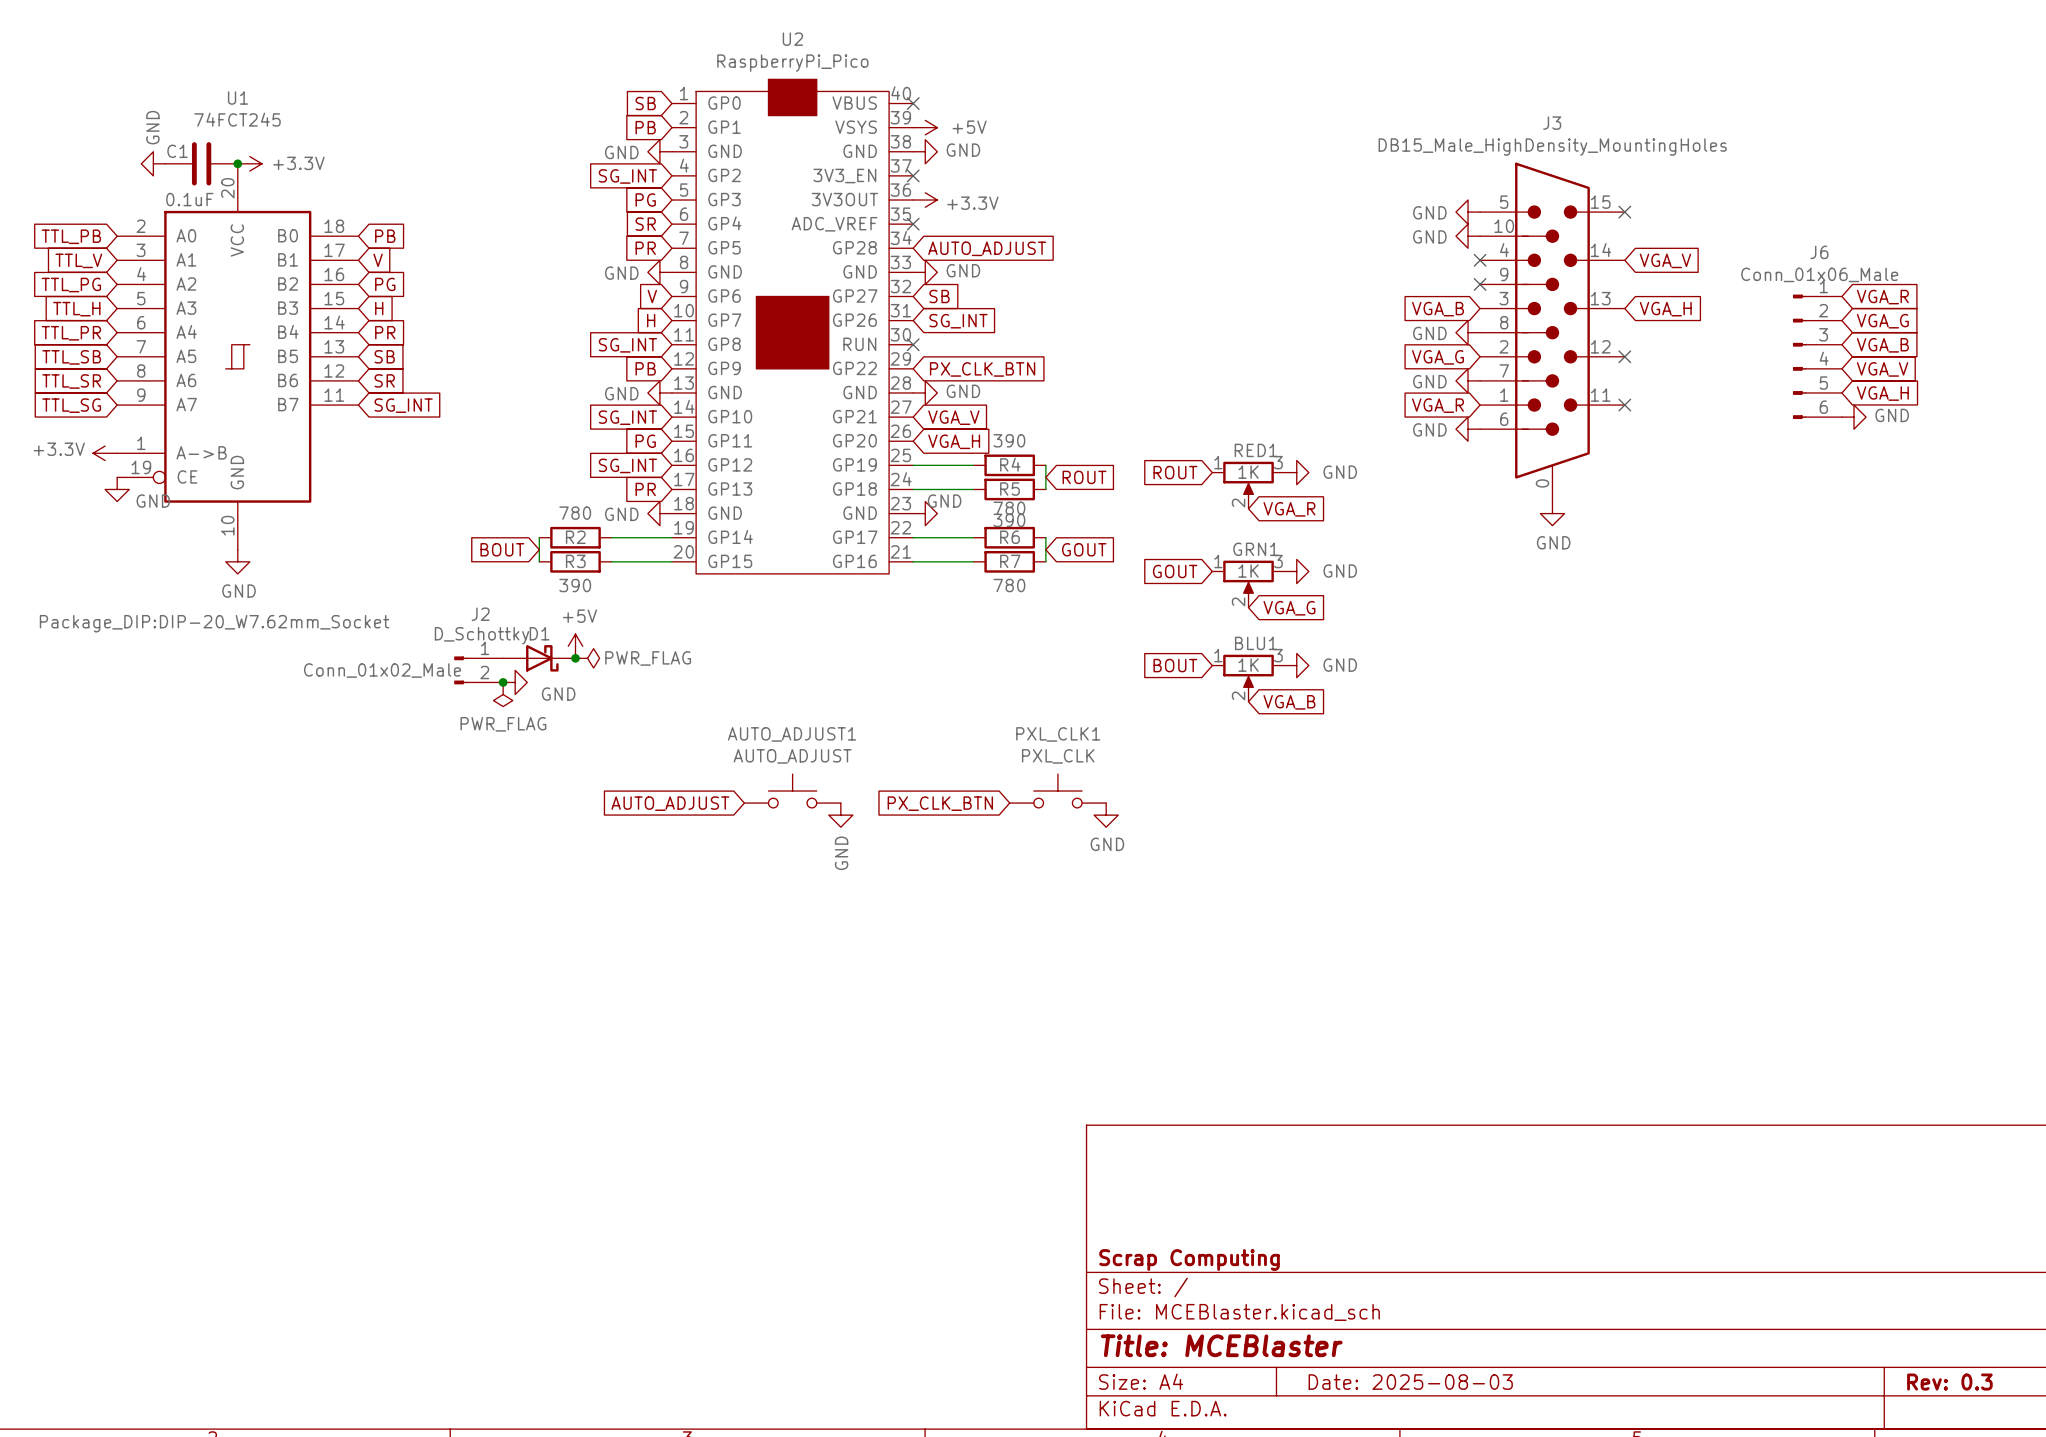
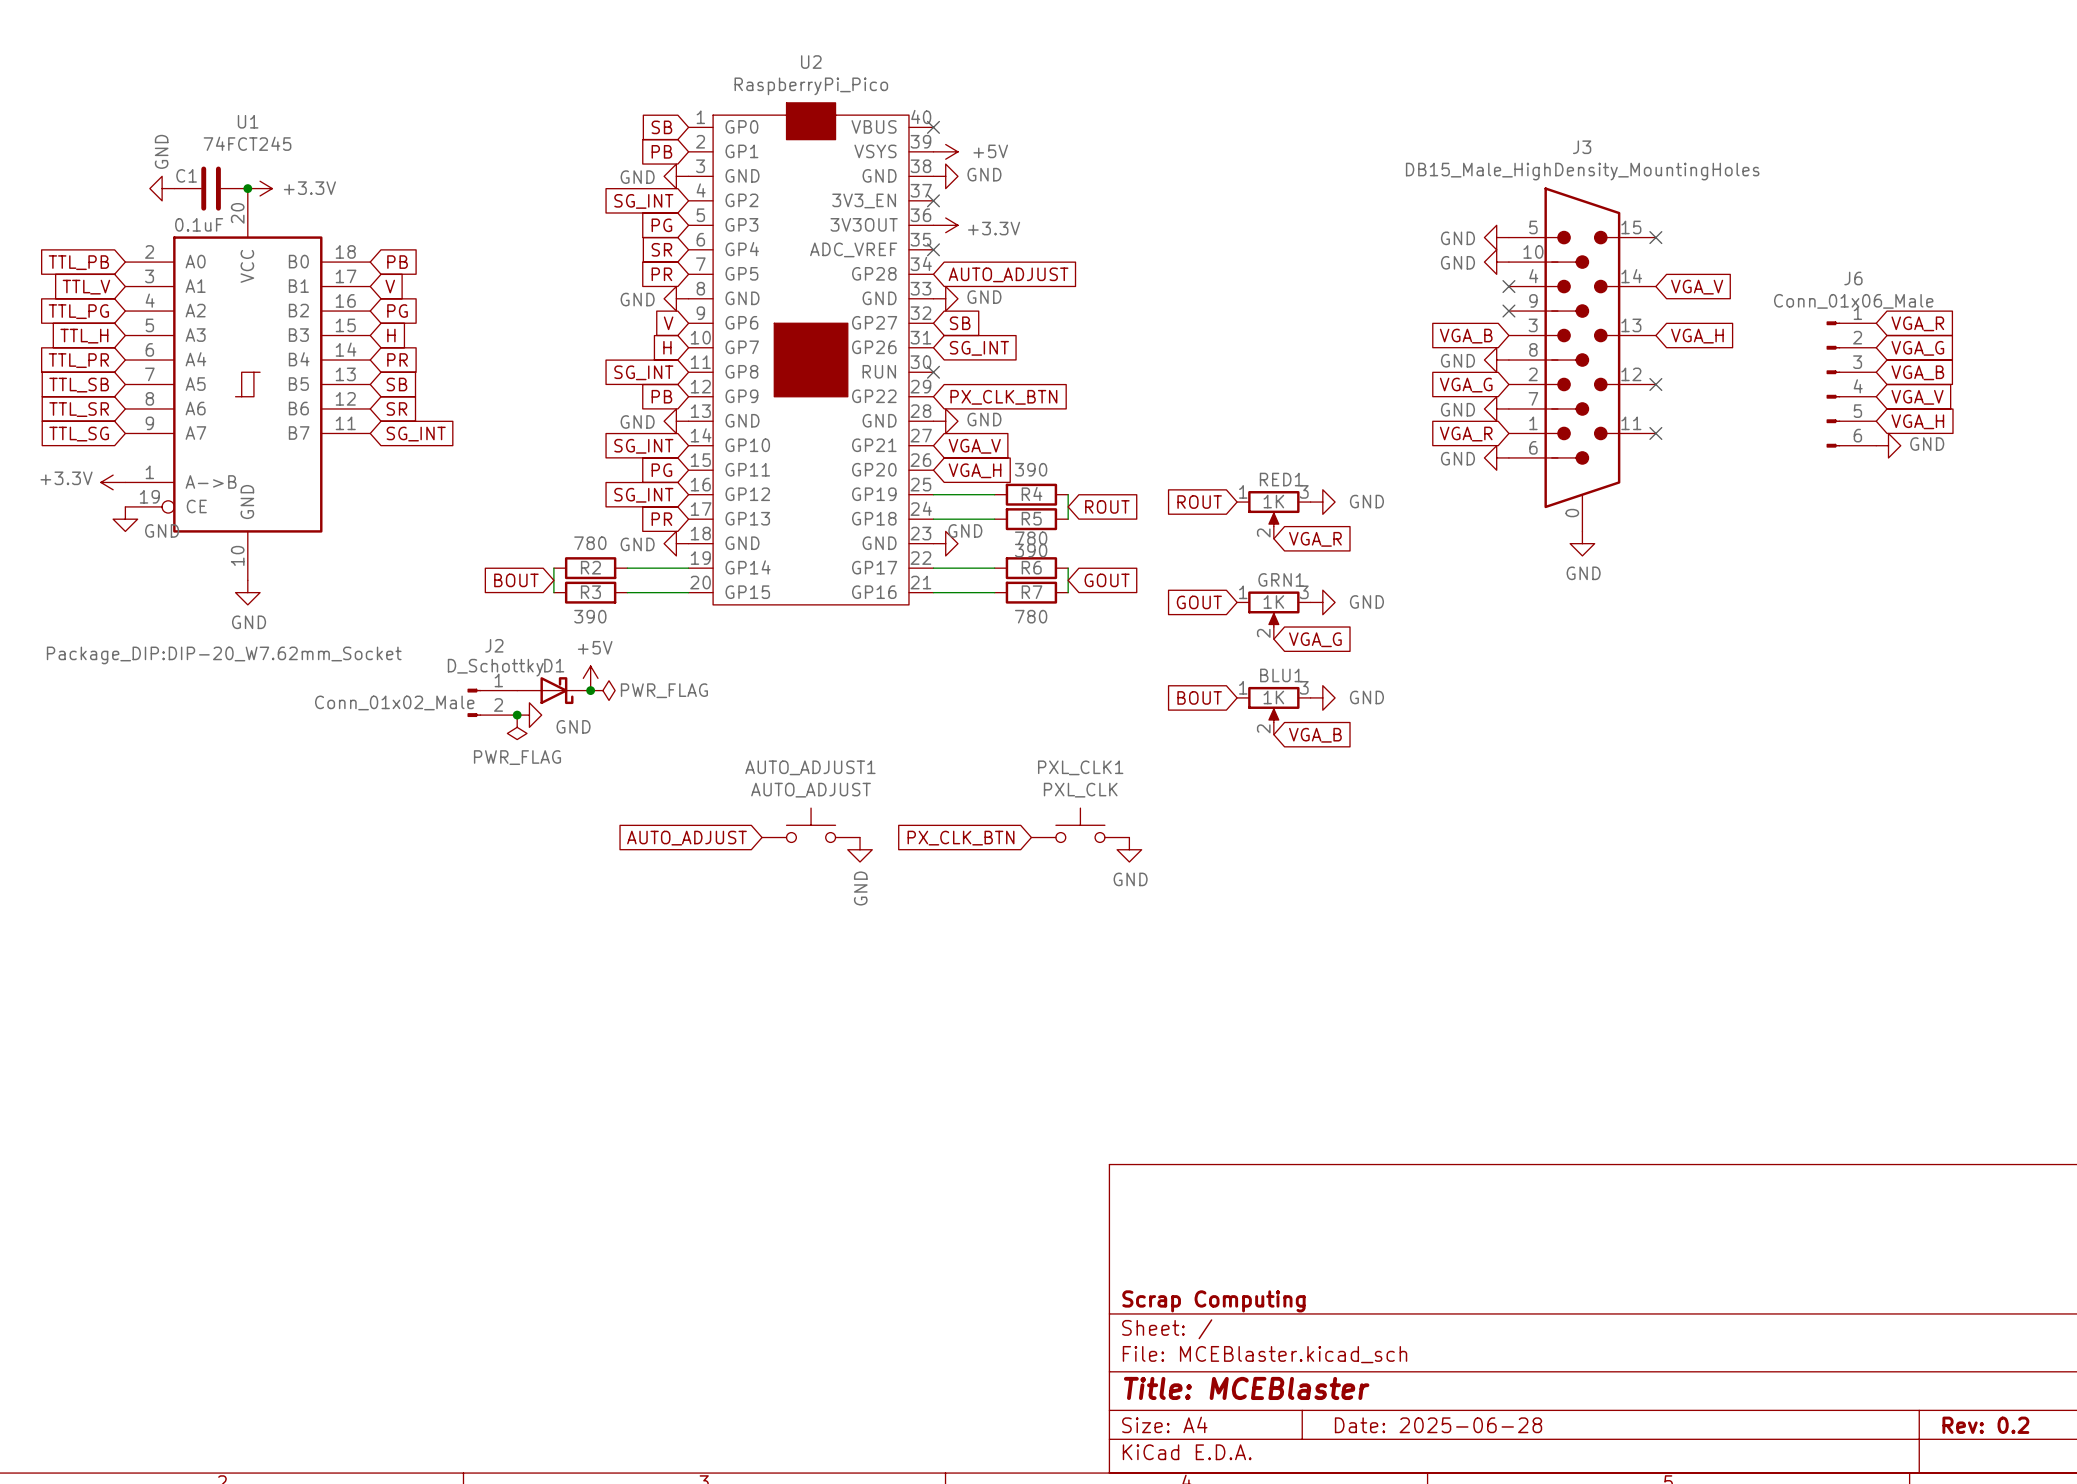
title block: Date: 2025-08-03 (1410, 1382) -> Date: 2025-06-28 (1438, 1425)
title block: Rev: 0.3 (1949, 1382) -> Rev: 0.2 (1985, 1425)

